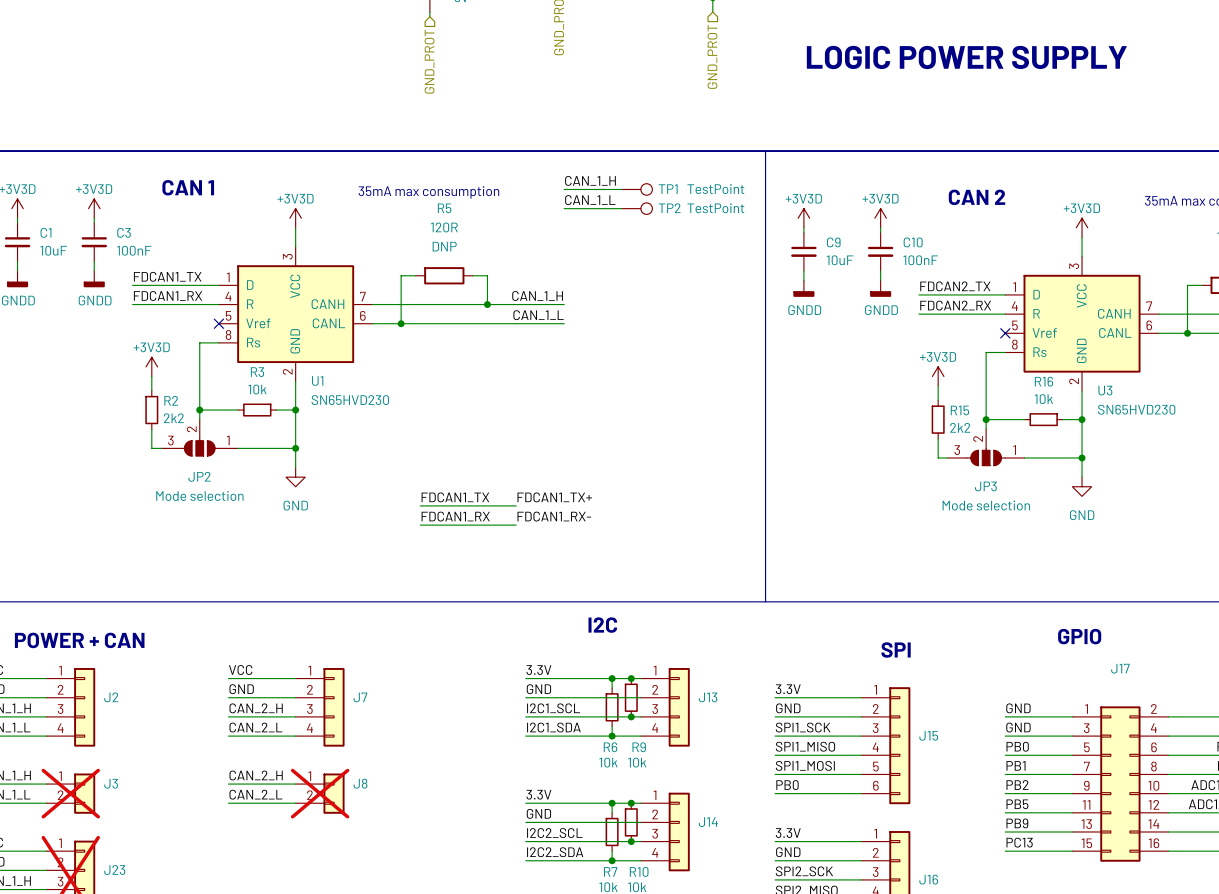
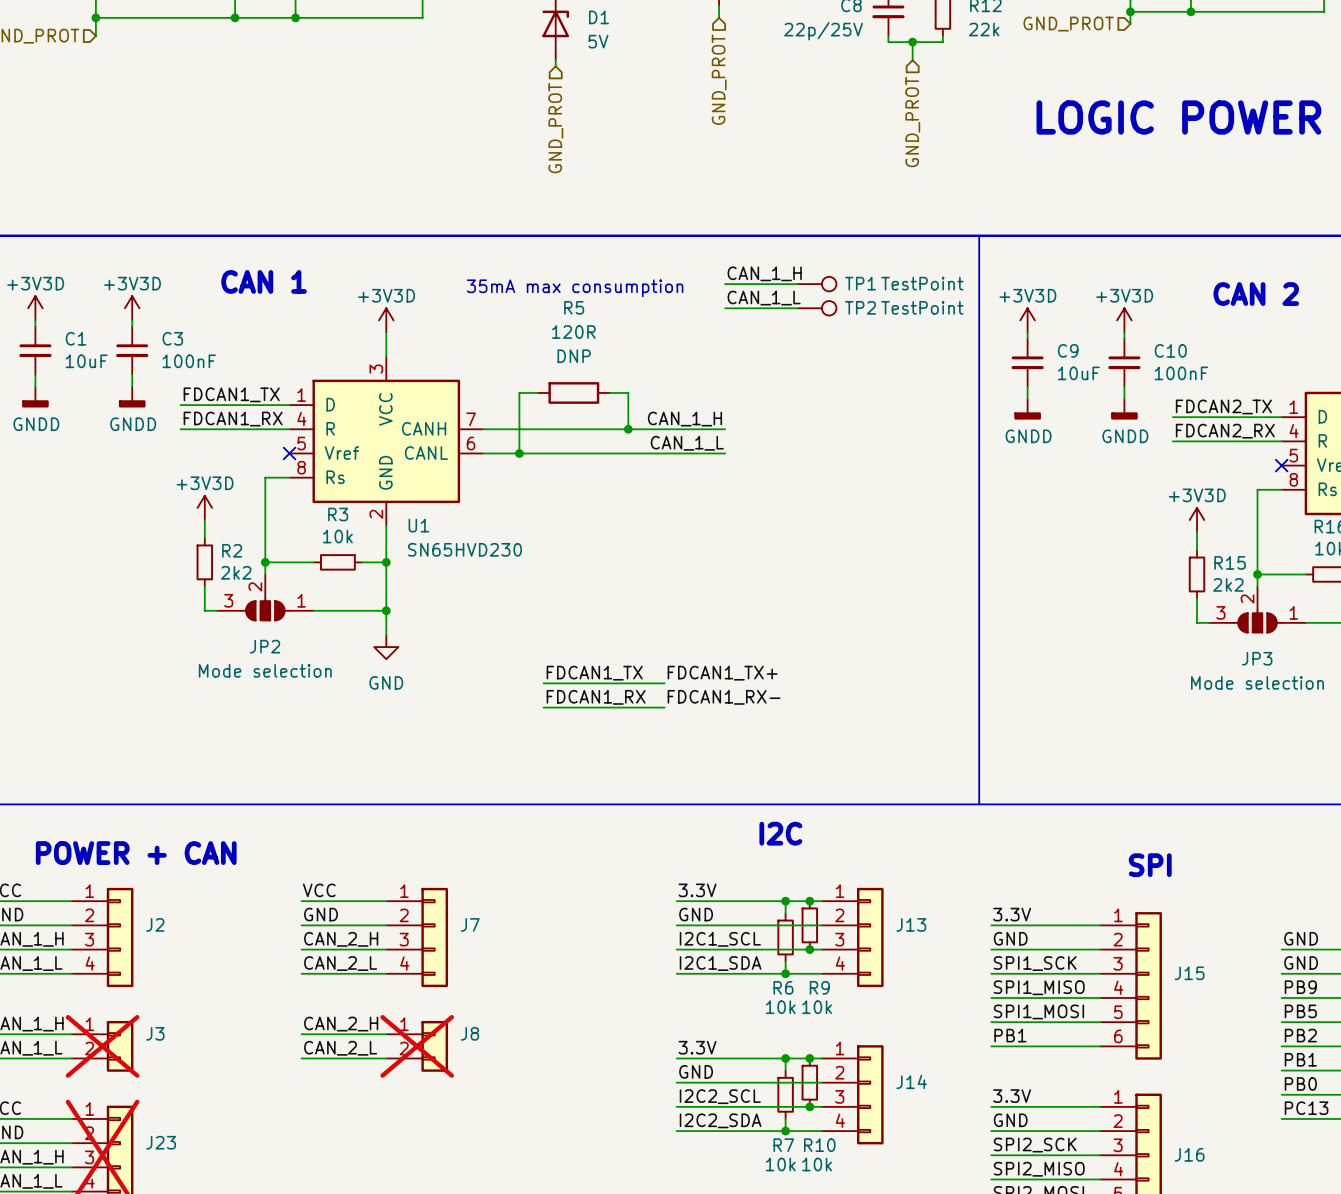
label: PB0 (1017, 746) -> PB9 (1300, 987)
label: PB1 (1016, 765) -> PB5 (1300, 1011)
label: PB0 (787, 785) -> PB1 (1010, 1035)
label: PB5 (1017, 804) -> PB1 (1300, 1059)
label: PB9 (1017, 823) -> PB0 (1300, 1083)

